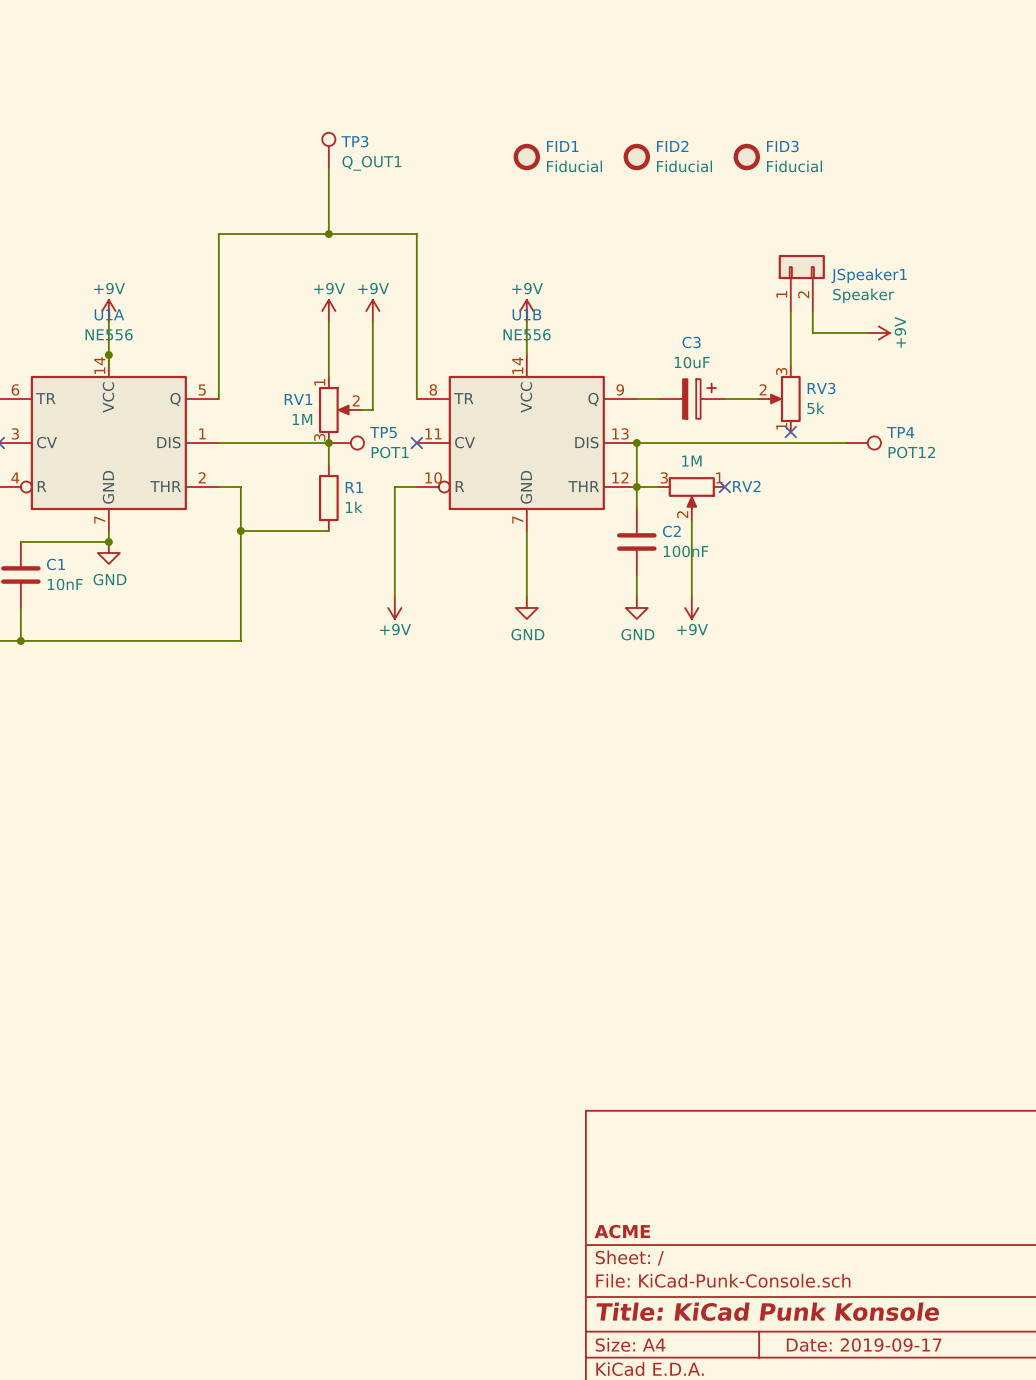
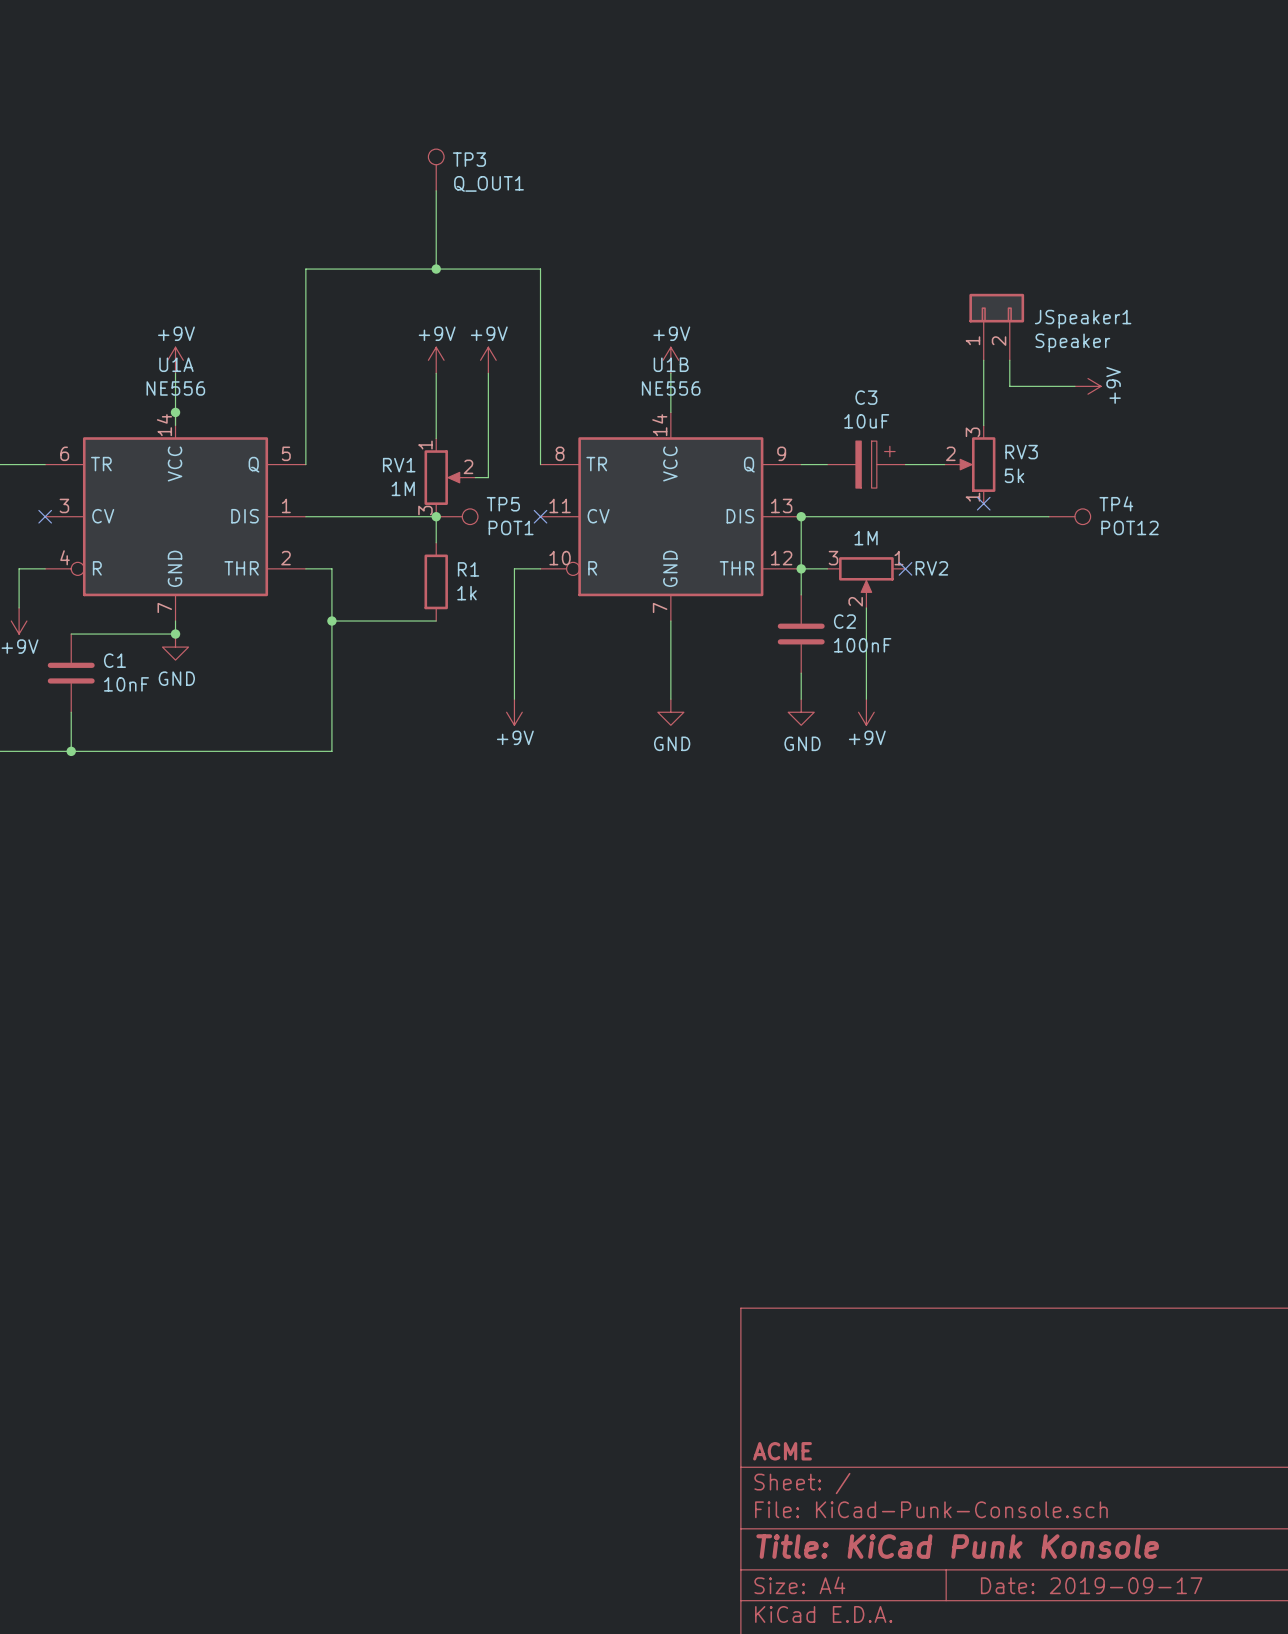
FID1: Fiducial (526, 157) -> none
FID2: Fiducial (636, 157) -> none
FID3: Fiducial (746, 157) -> none

